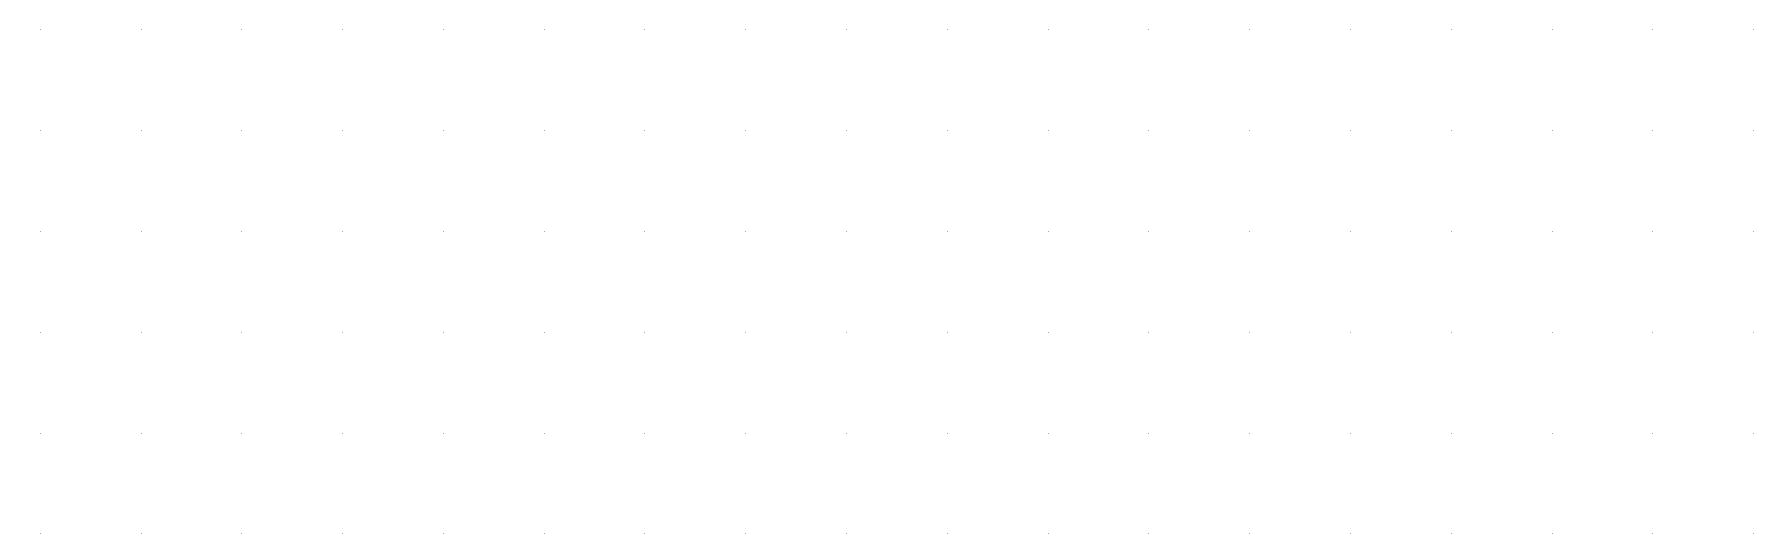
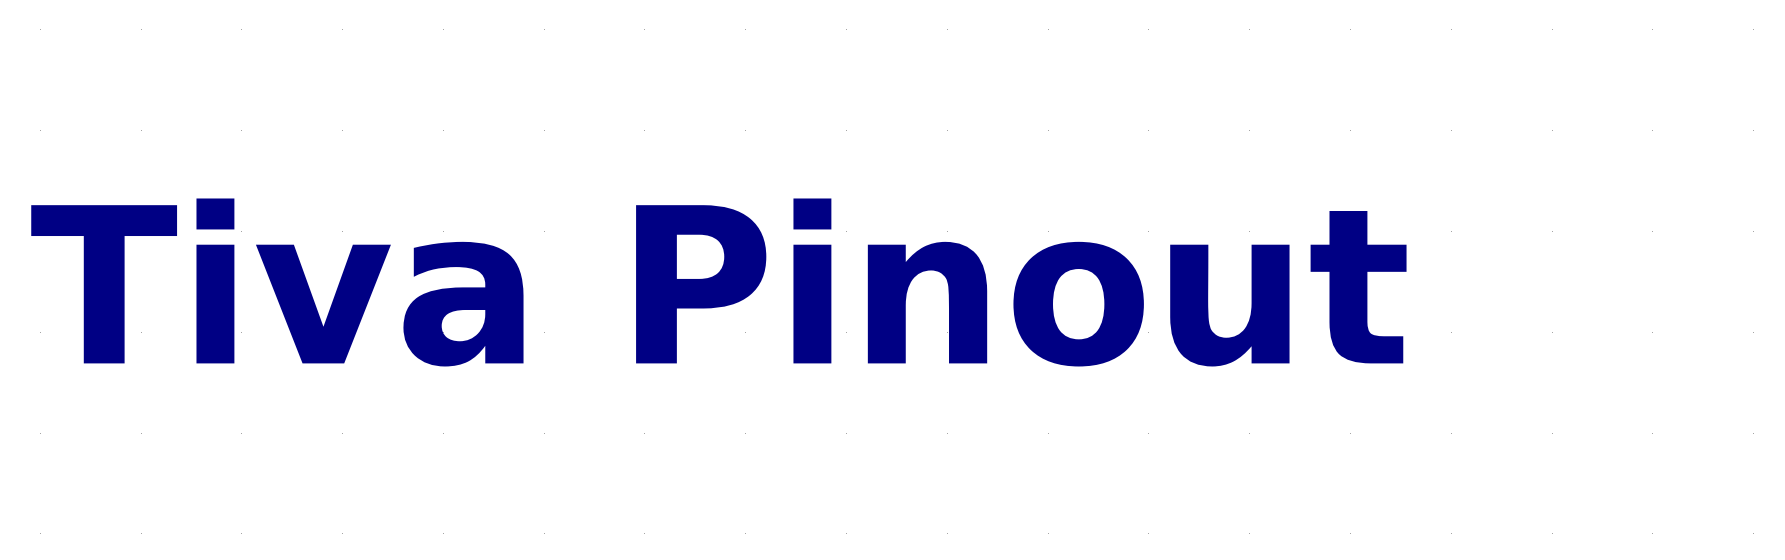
text: none -> Tiva Pinout (718, 282)

